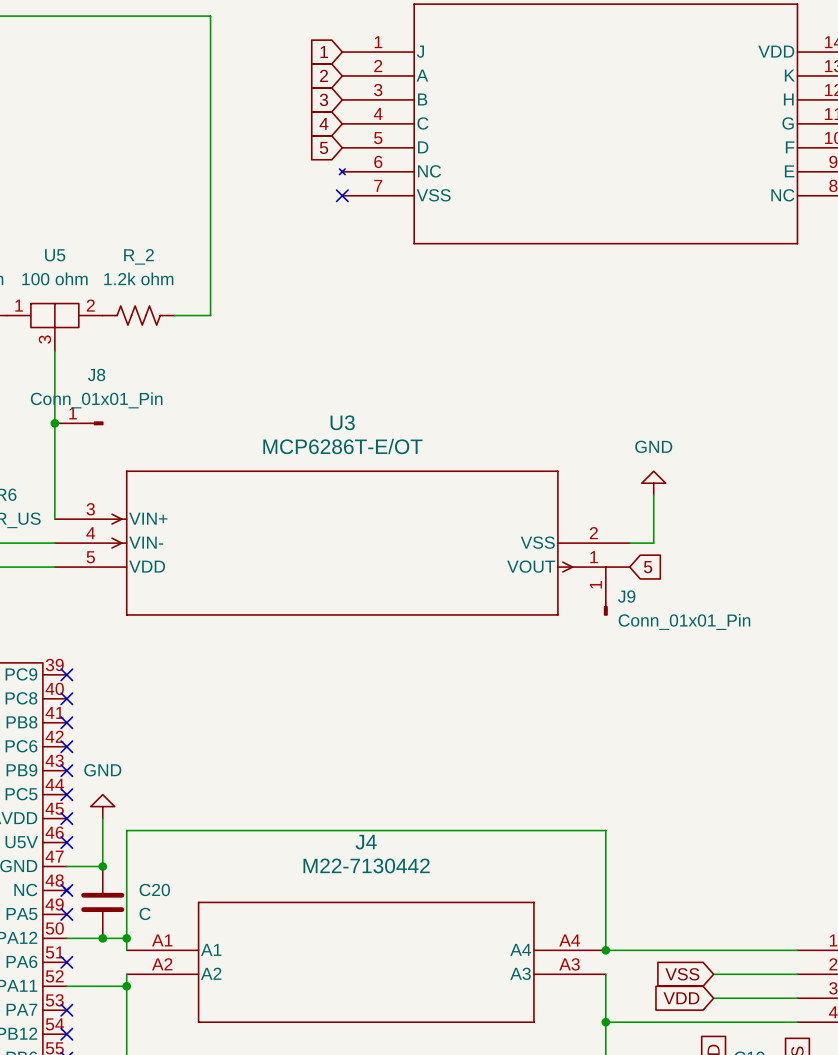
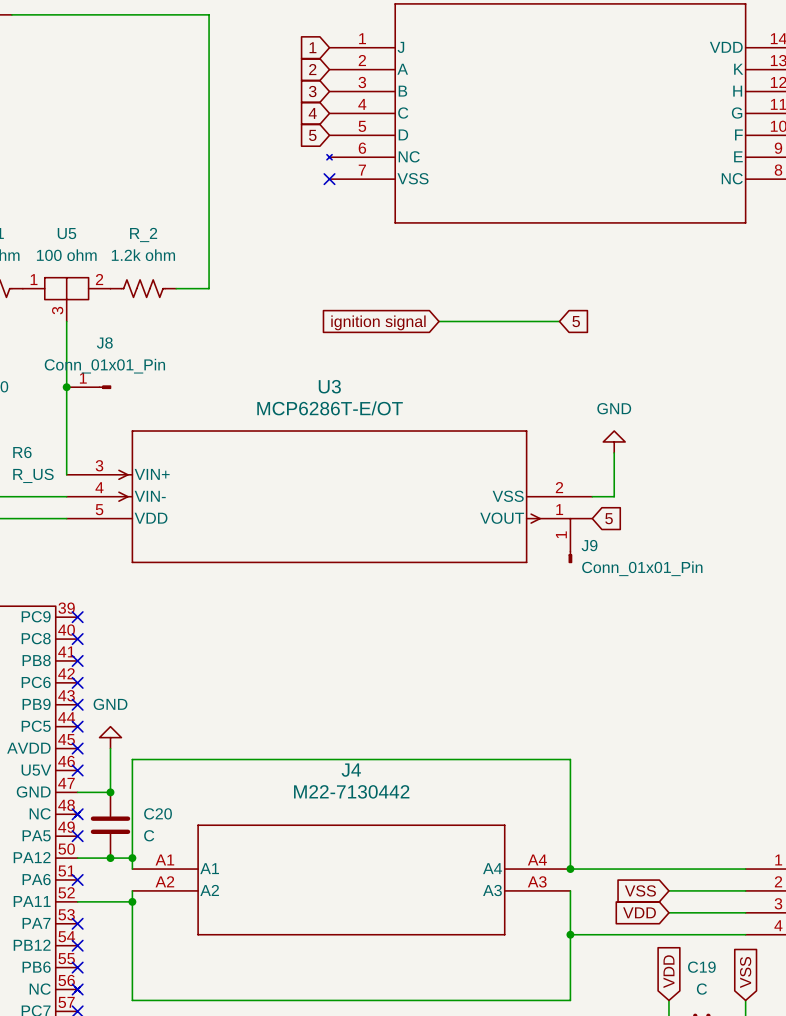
wire: none -> (439, 321) (559, 321)
global label: none -> 5 (576, 321)
global label: none -> ignition signal (378, 322)

